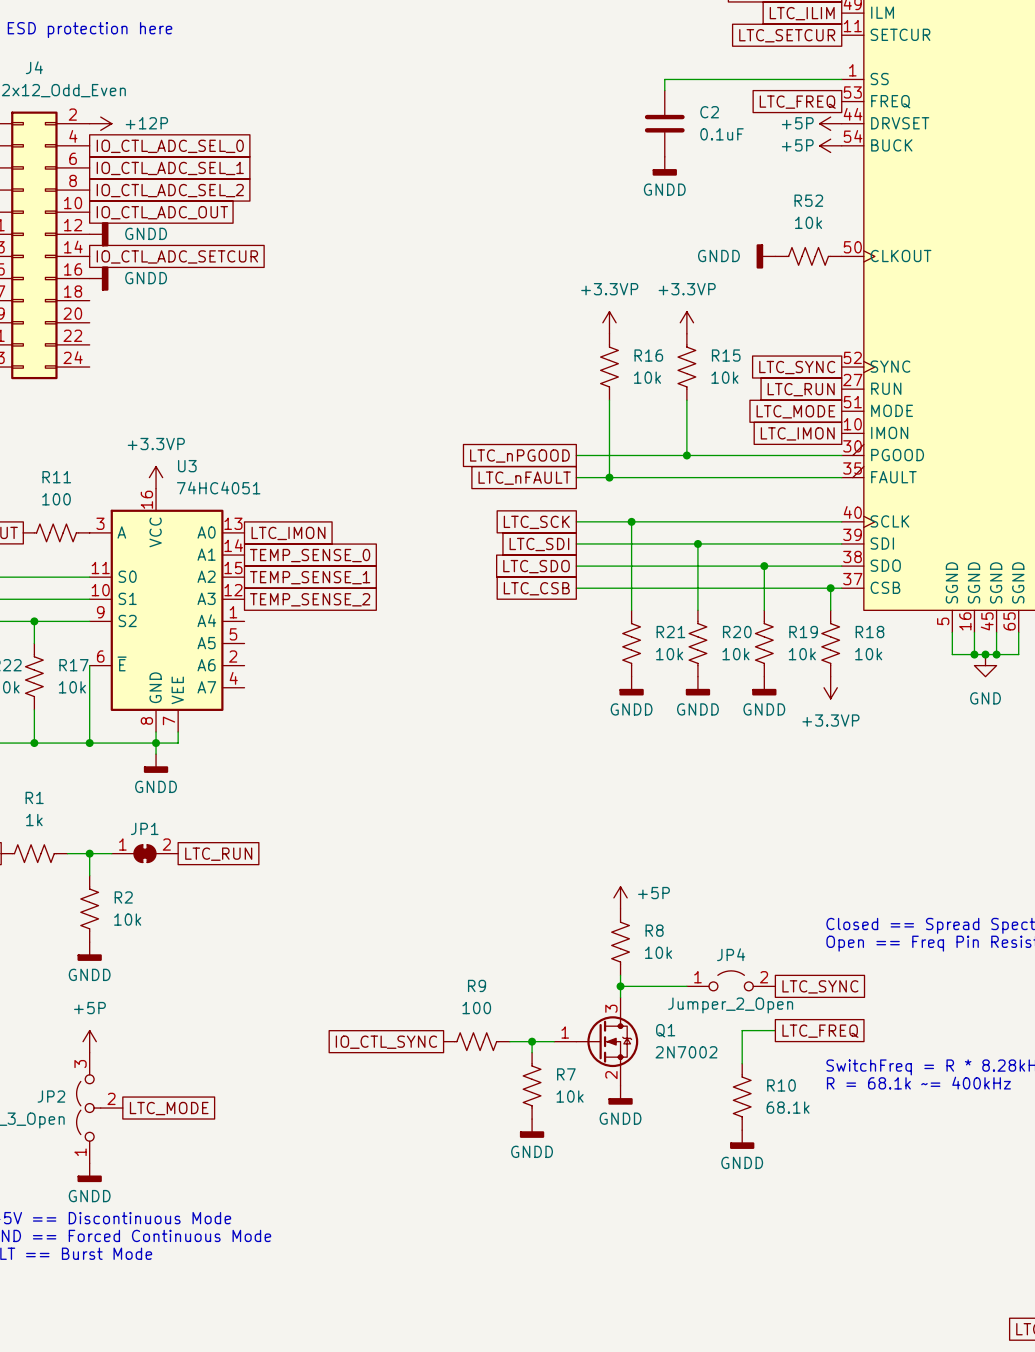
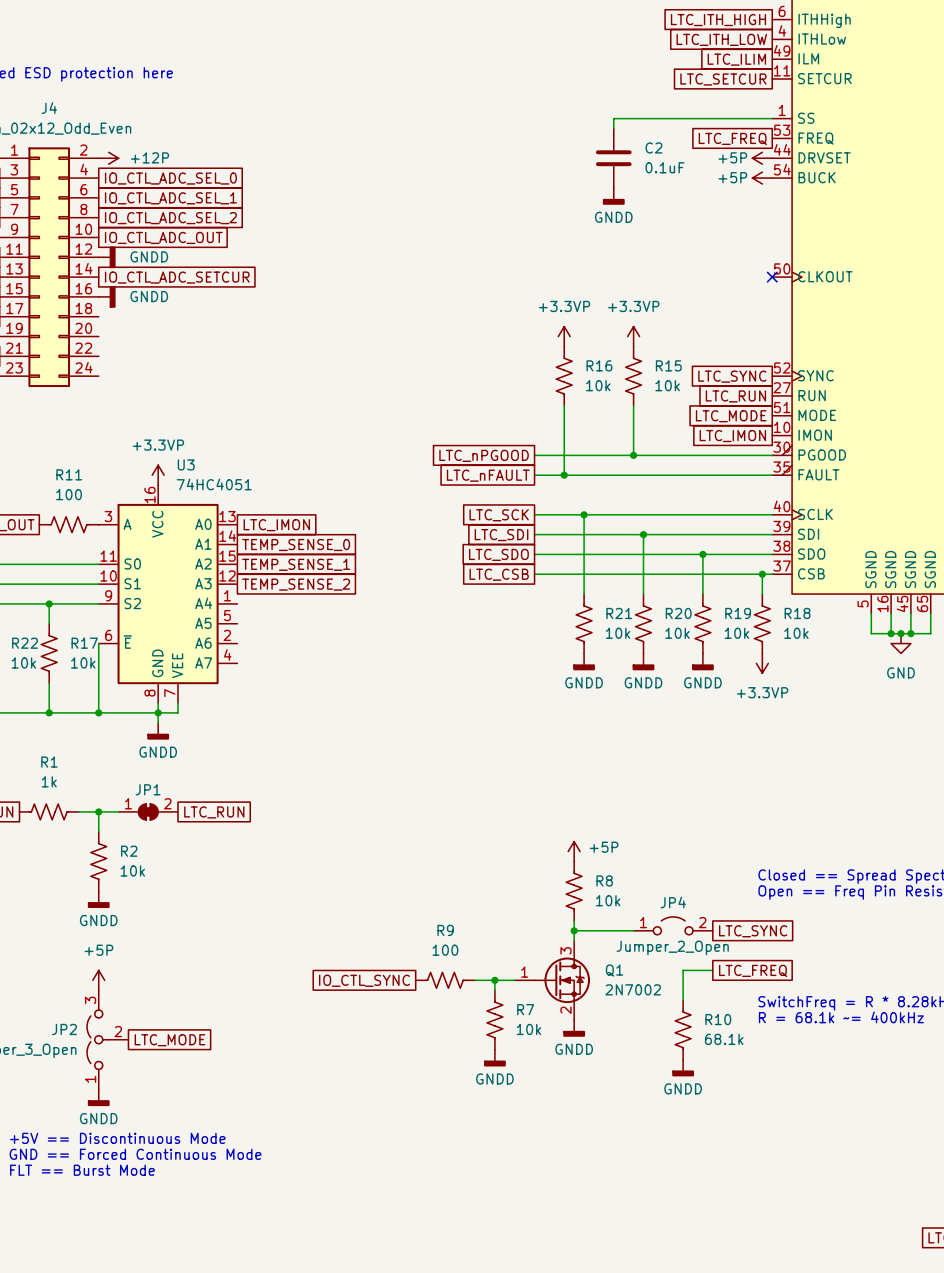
power symbol: GNDD (765, 256) -> none
R52: 10k (808, 256) -> none
no-connect mark: none -> (772, 277)

